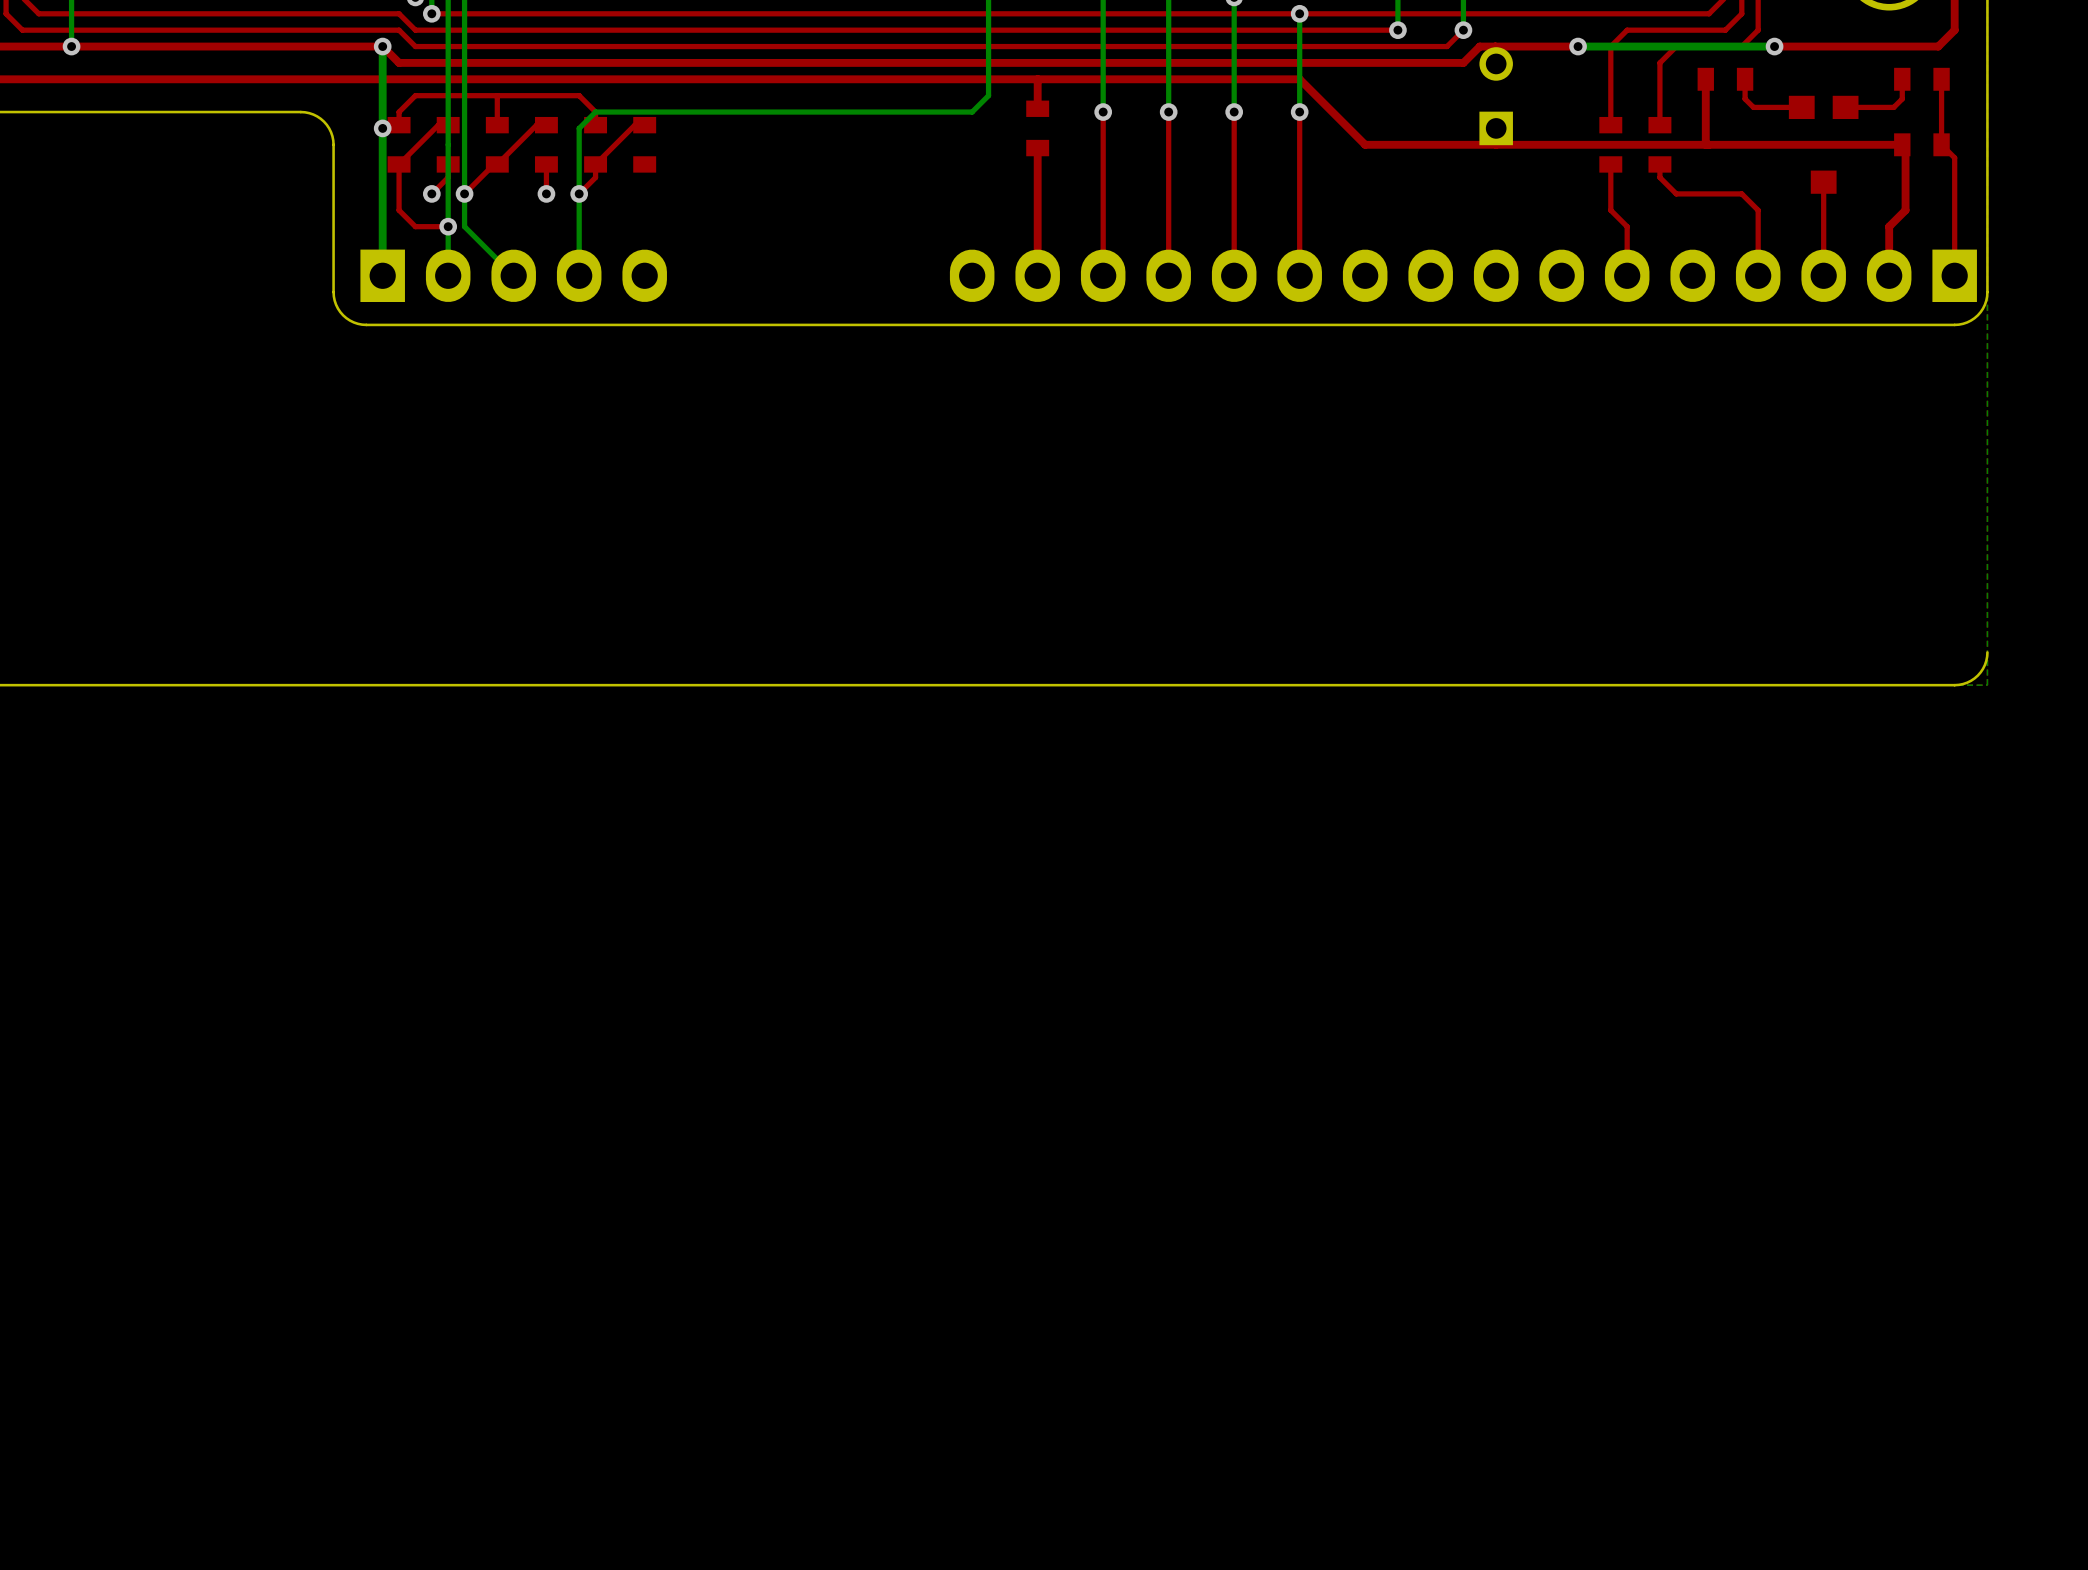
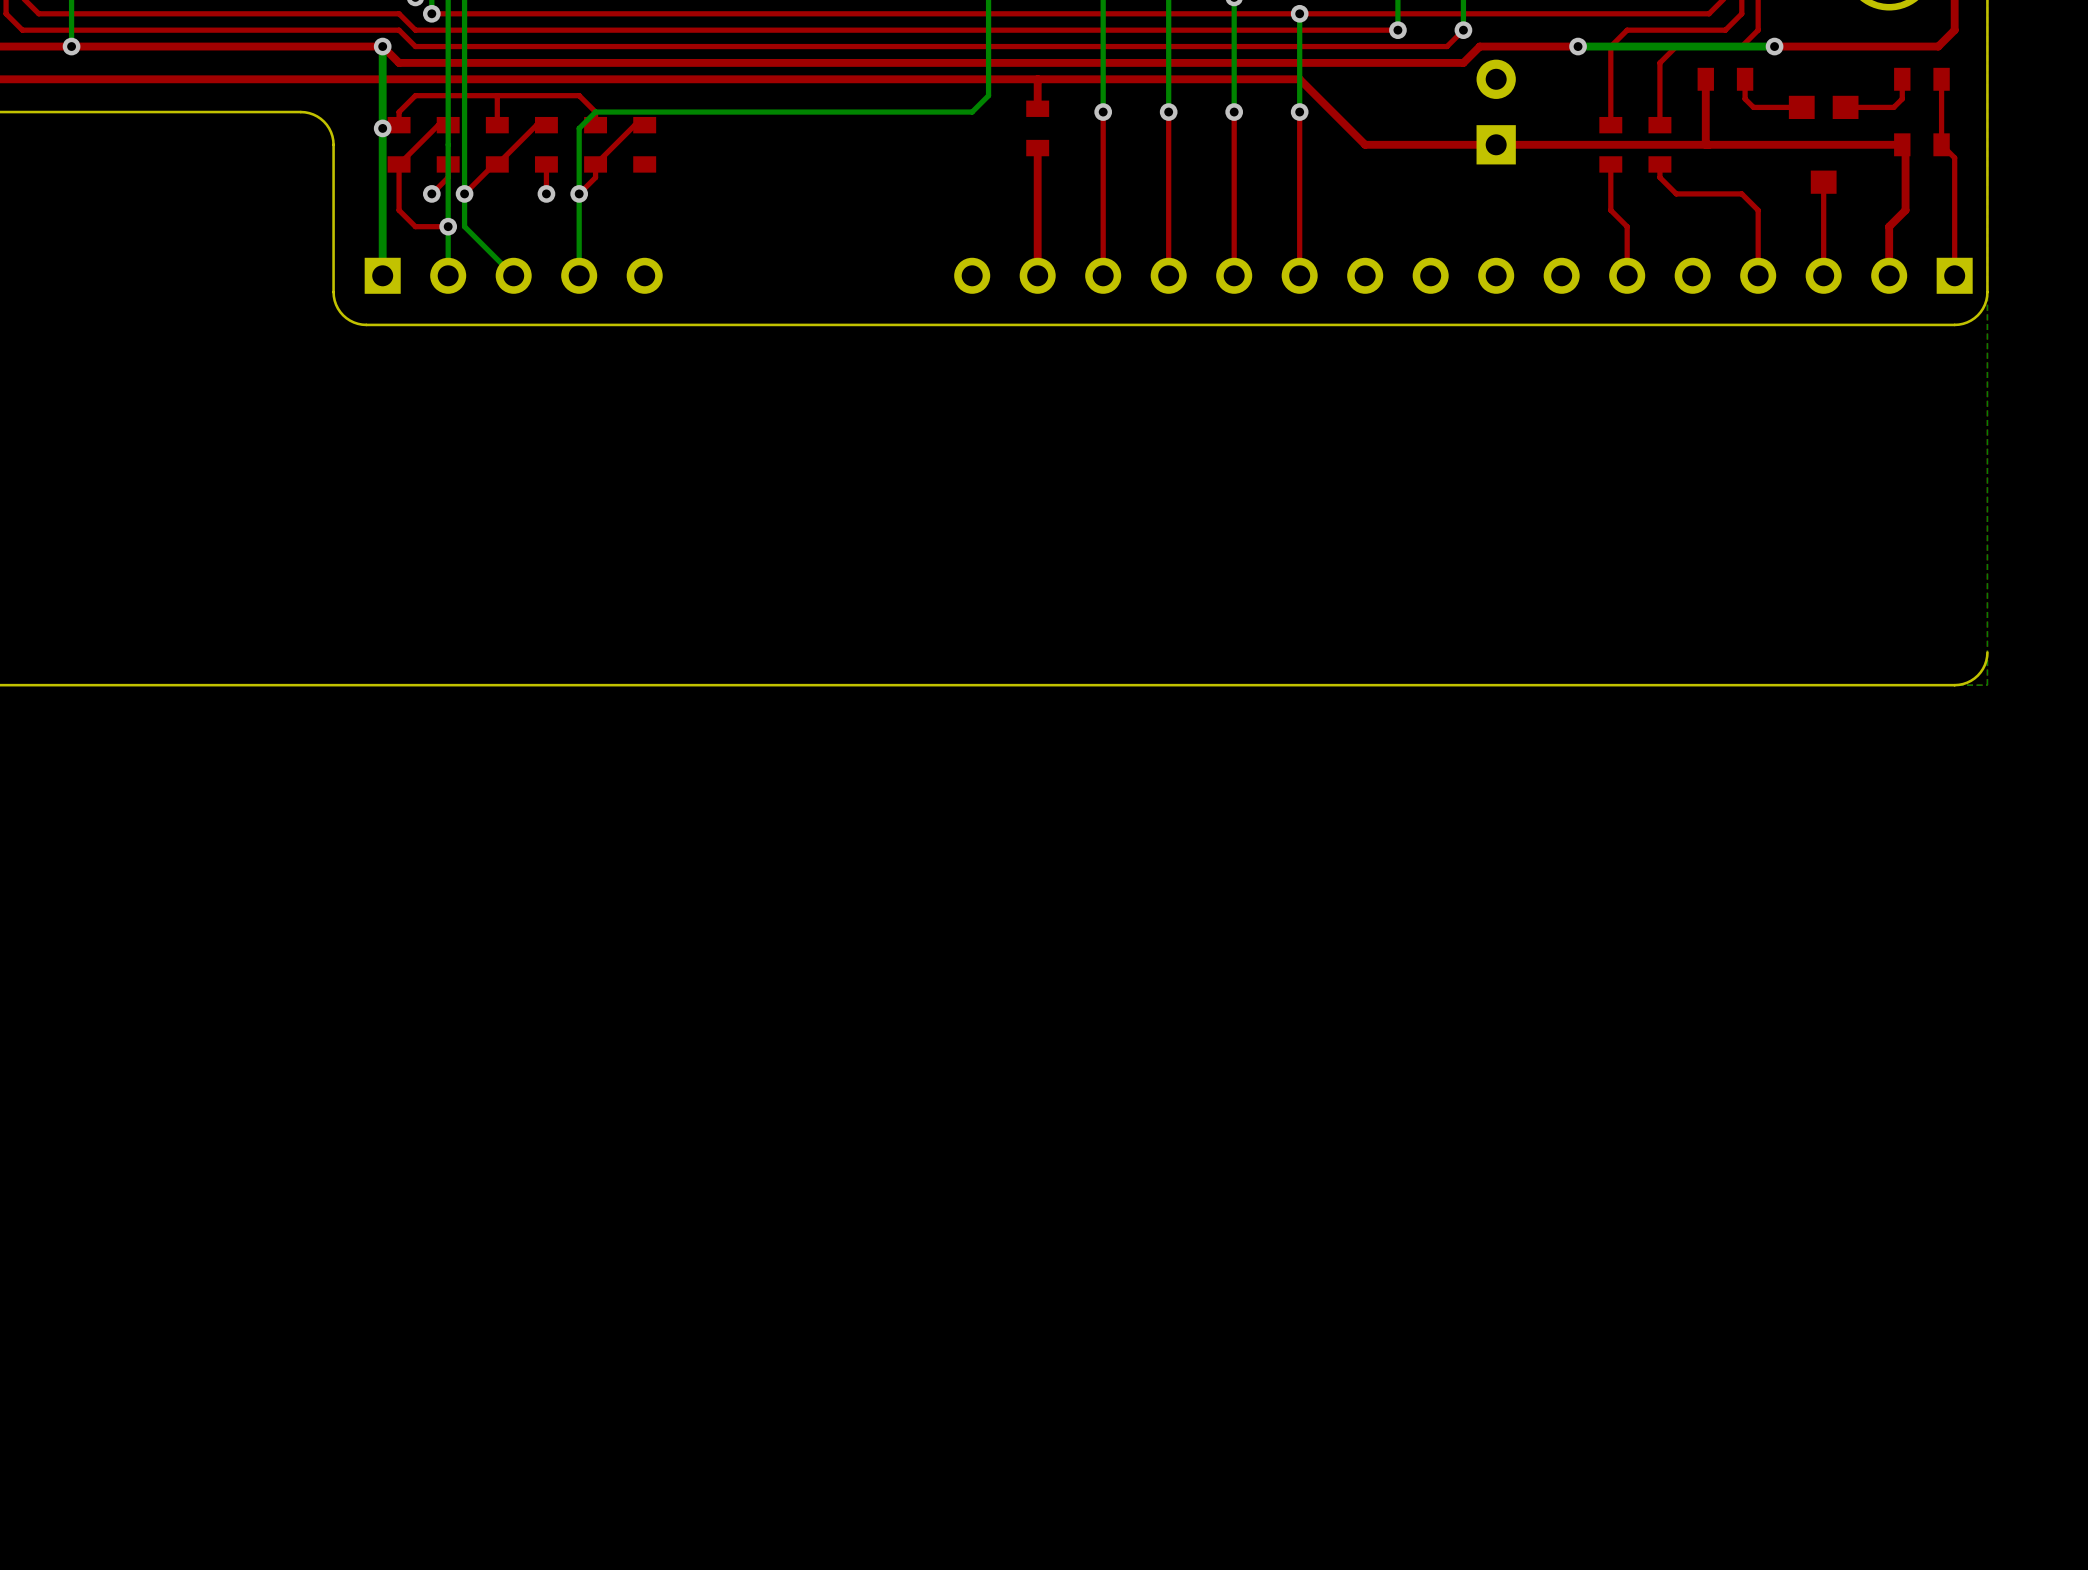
part footprint: [1479, 47, 1513, 146] -> [1476, 59, 1516, 165]
part footprint: [360, 249, 667, 302] -> [364, 257, 663, 294]
part footprint: [949, 249, 1977, 302] -> [954, 257, 1973, 294]

